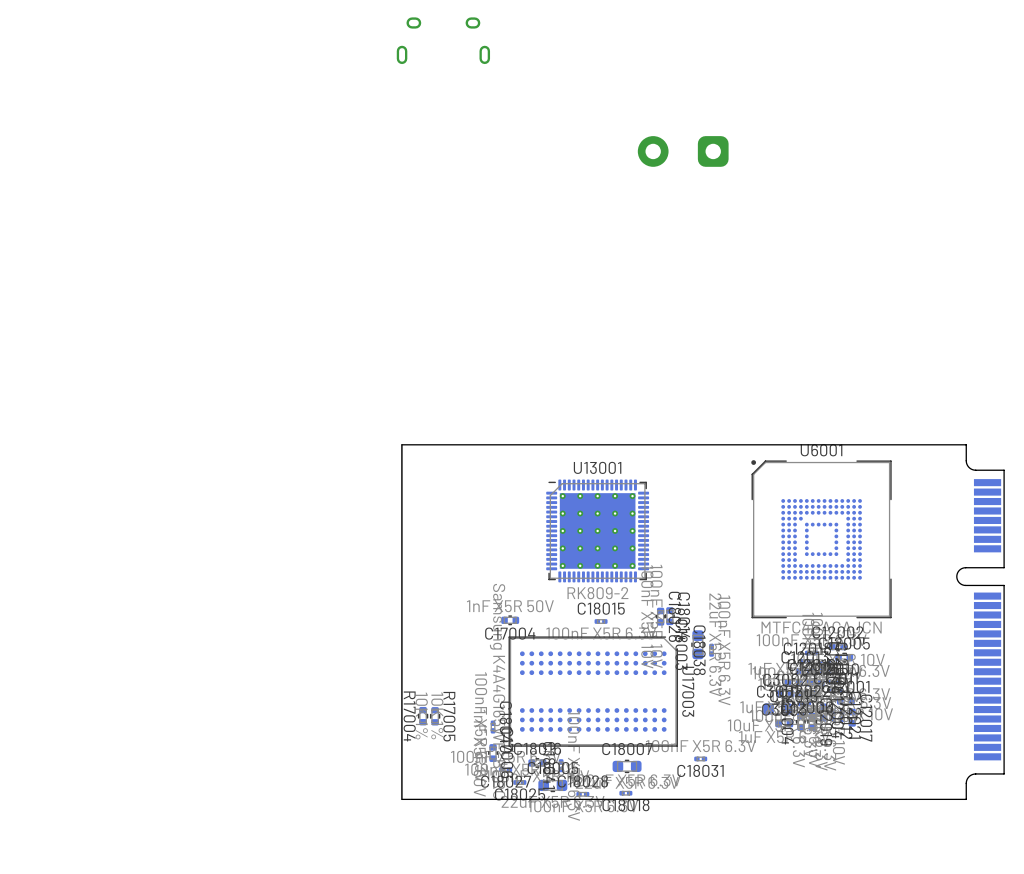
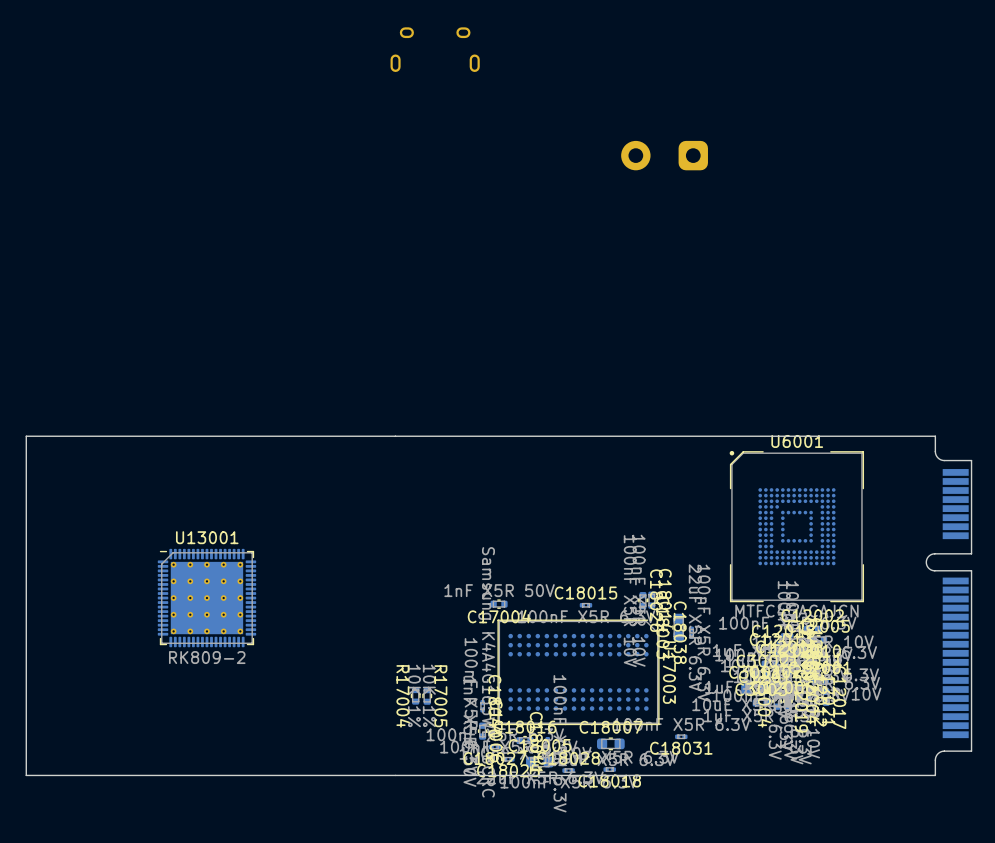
board edge: (401, 444) (401, 799) -> (395, 436) (26, 436) (26, 775) (395, 775)
U13001 position: (597, 530) -> (206, 598)

